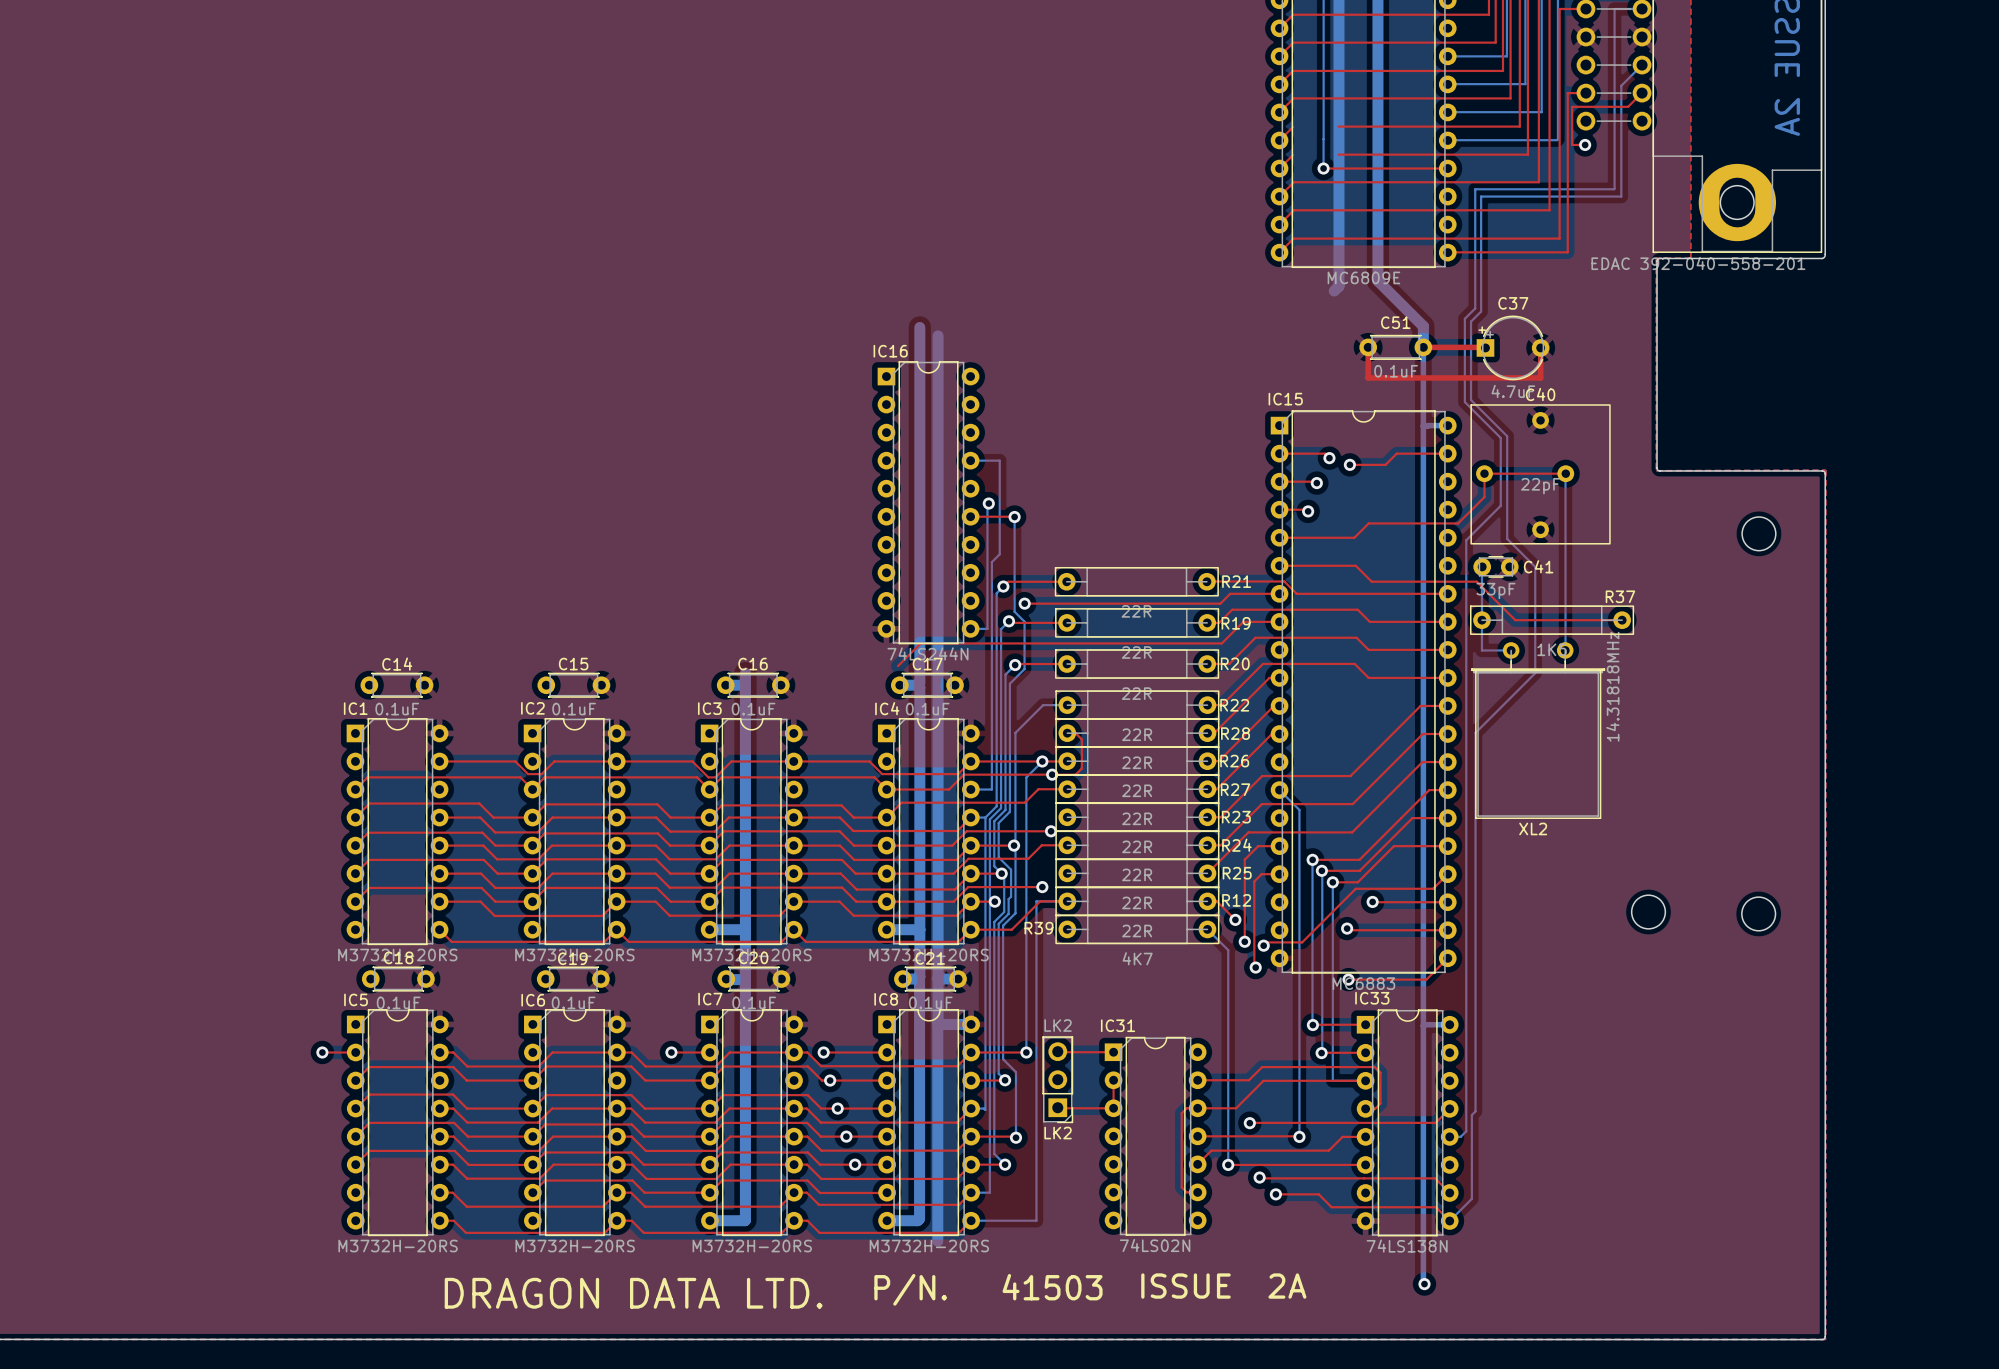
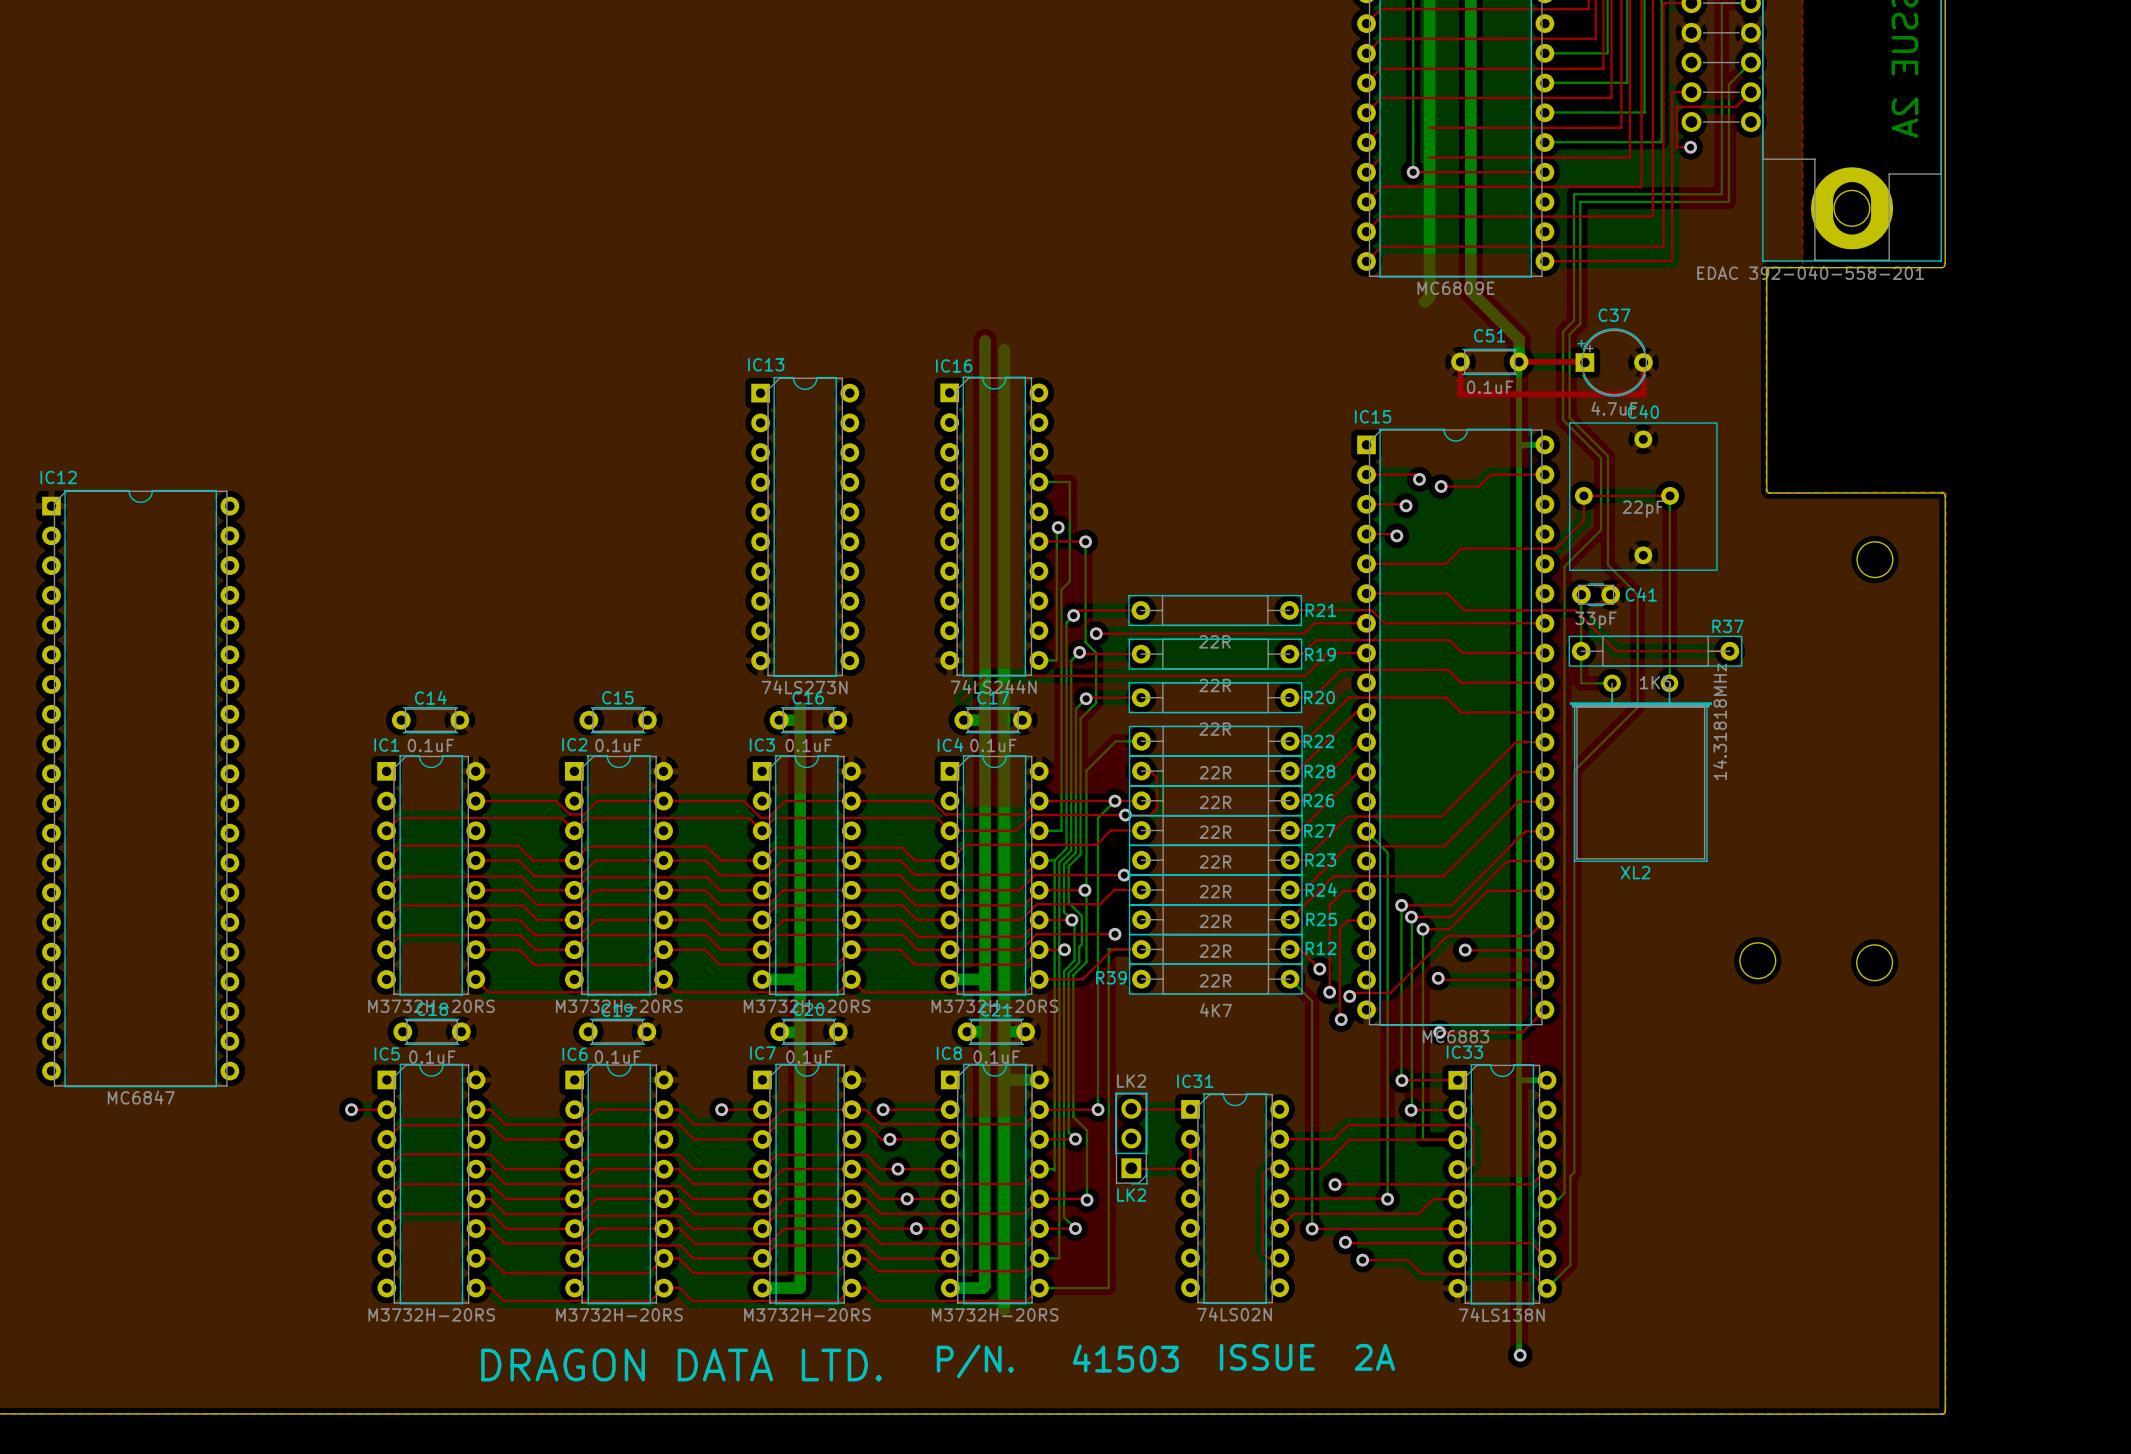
IC13: none -> 74LS273N (805, 526)
IC12: none -> MC6847 (140, 788)

